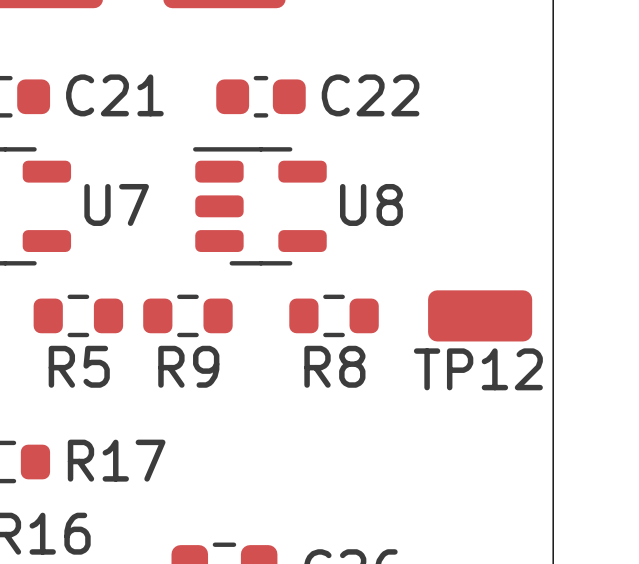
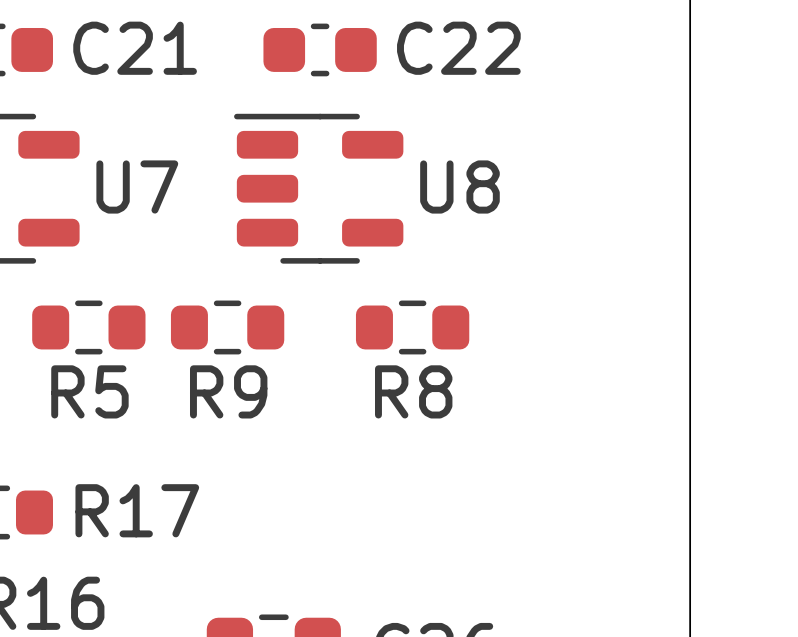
TP12: (480, 315) -> none

